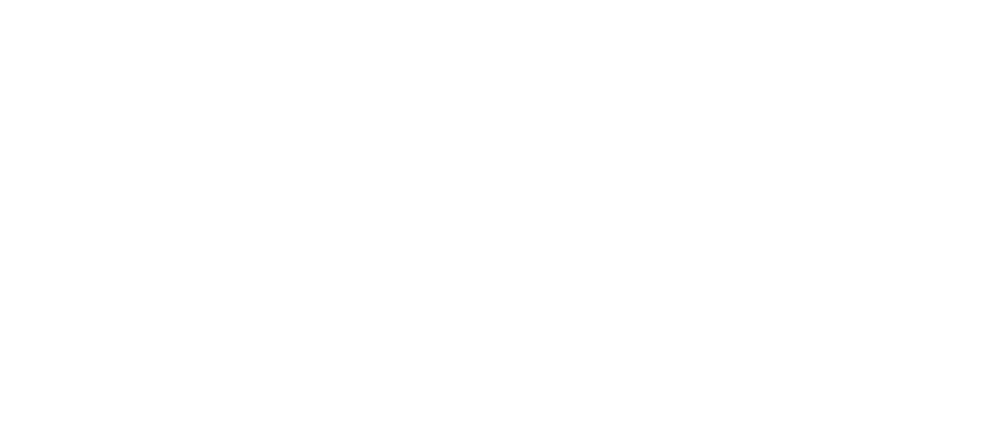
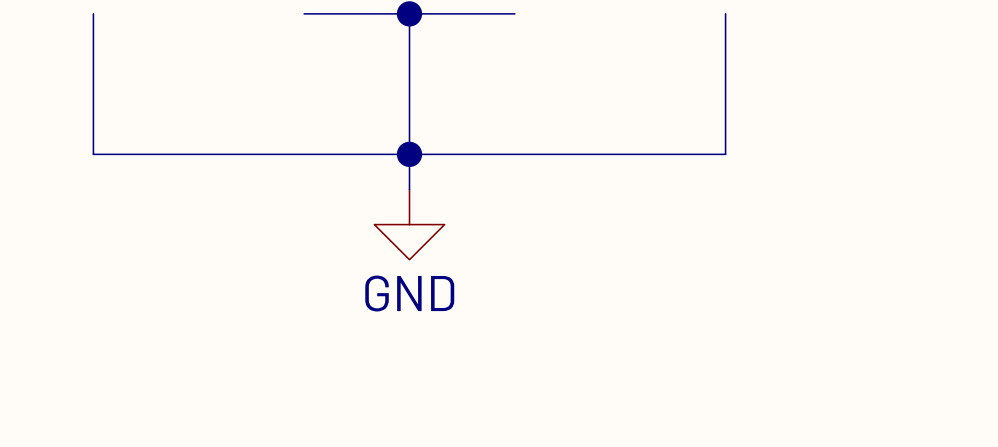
wire: none -> (93, 13) (93, 154) (725, 154) (725, 13)
wire: none -> (304, 13) (514, 13)
wire: none -> (409, 13) (409, 189)
junction: none -> (409, 13)
junction: none -> (409, 154)
power symbol: none -> GND (409, 224)

